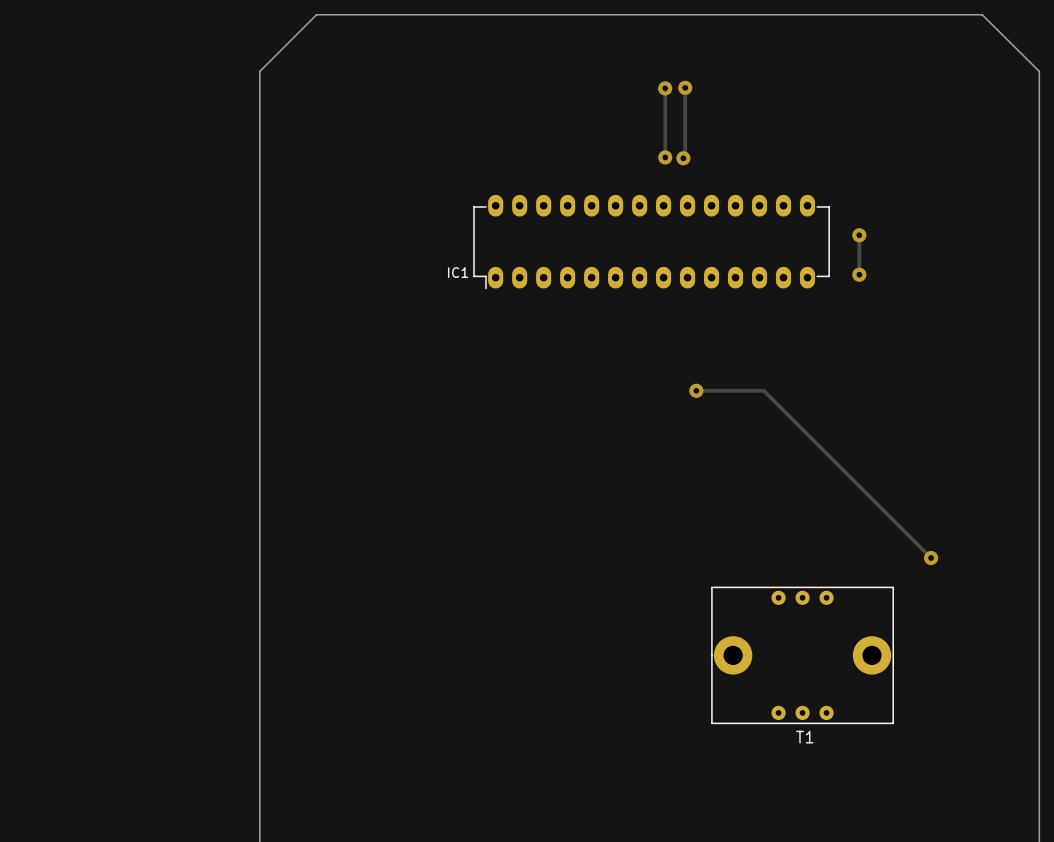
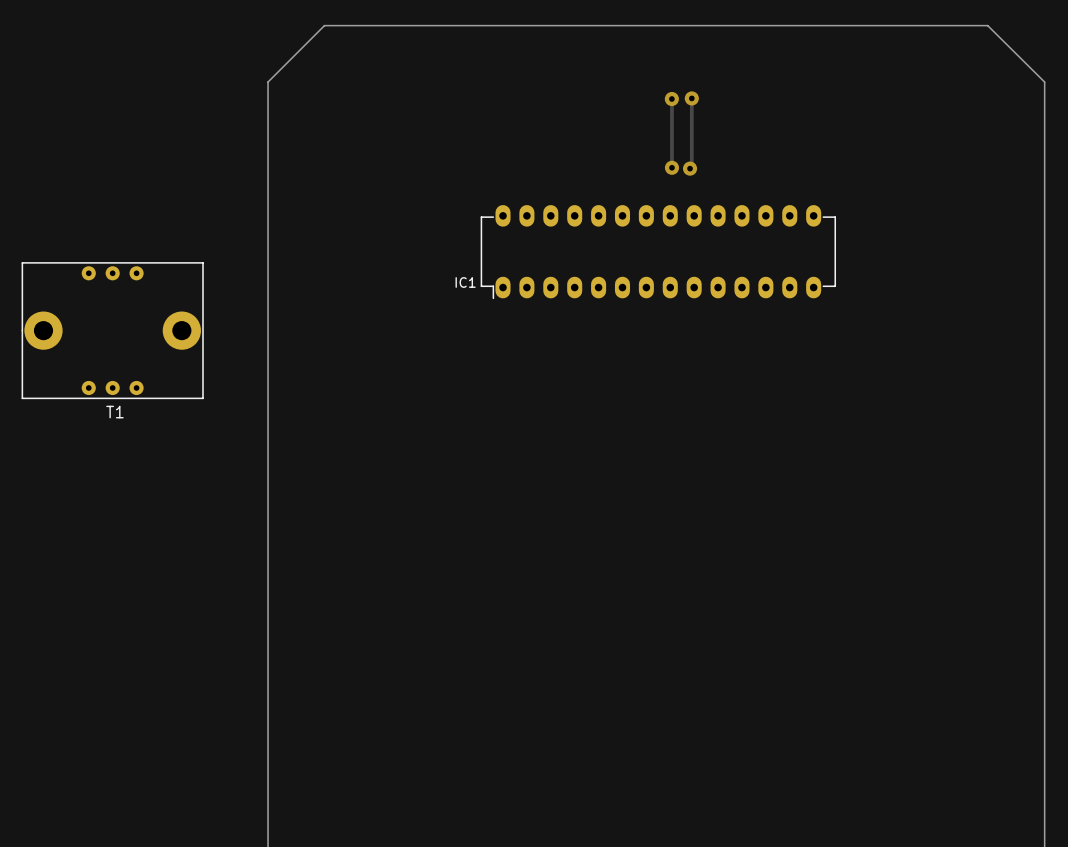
track: (859, 235) (859, 274) -> none
via: (859, 235) -> none
via: (859, 274) -> none
track: (696, 390) (763, 390) (931, 558) -> none
via: (696, 390) -> none
via: (931, 558) -> none
T1 position: (802, 655) -> (112, 330)

